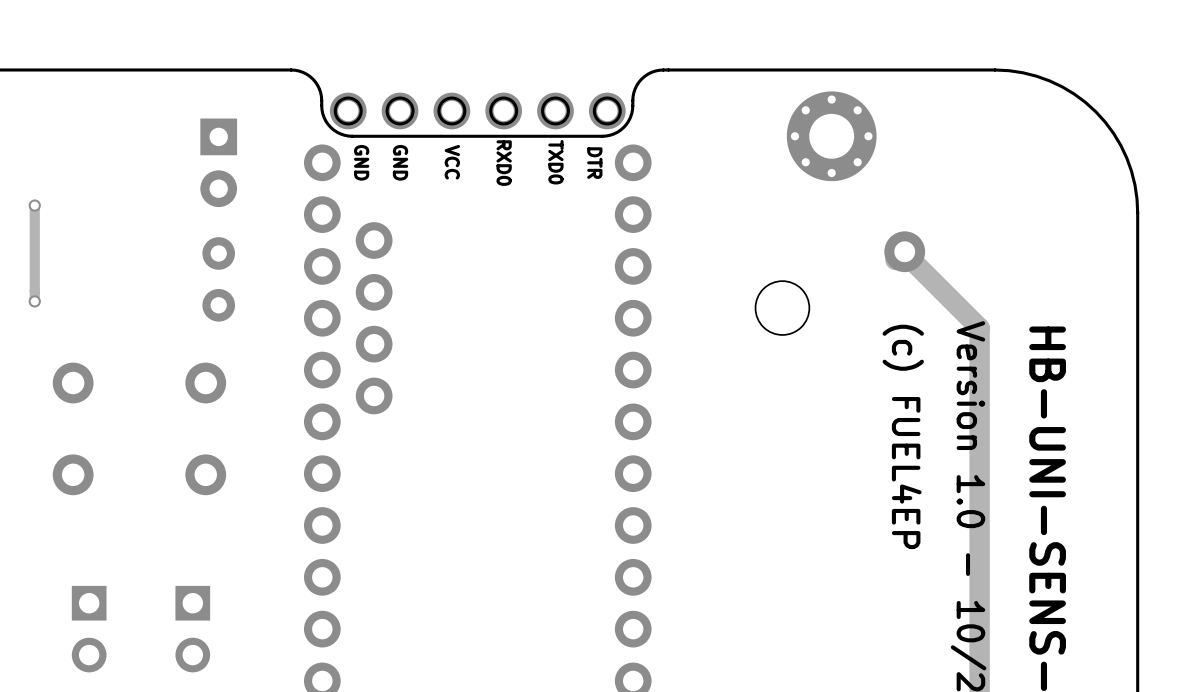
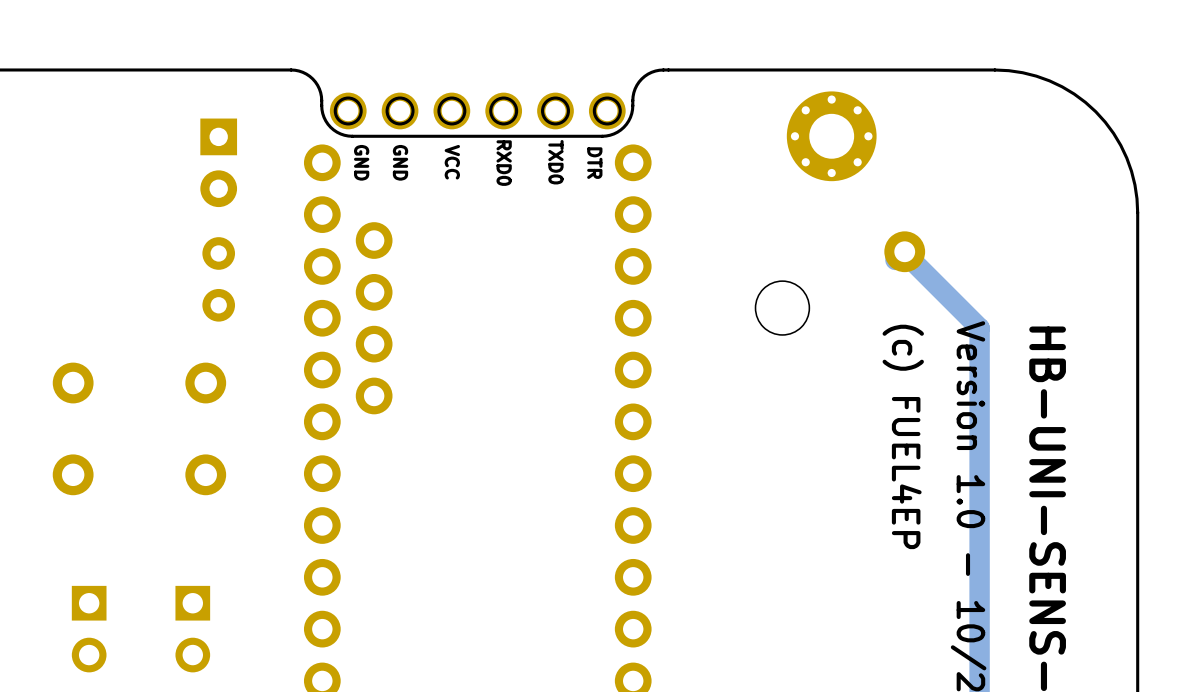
track: (34, 205) (34, 301) -> none
via: (34, 205) -> none
via: (34, 301) -> none

